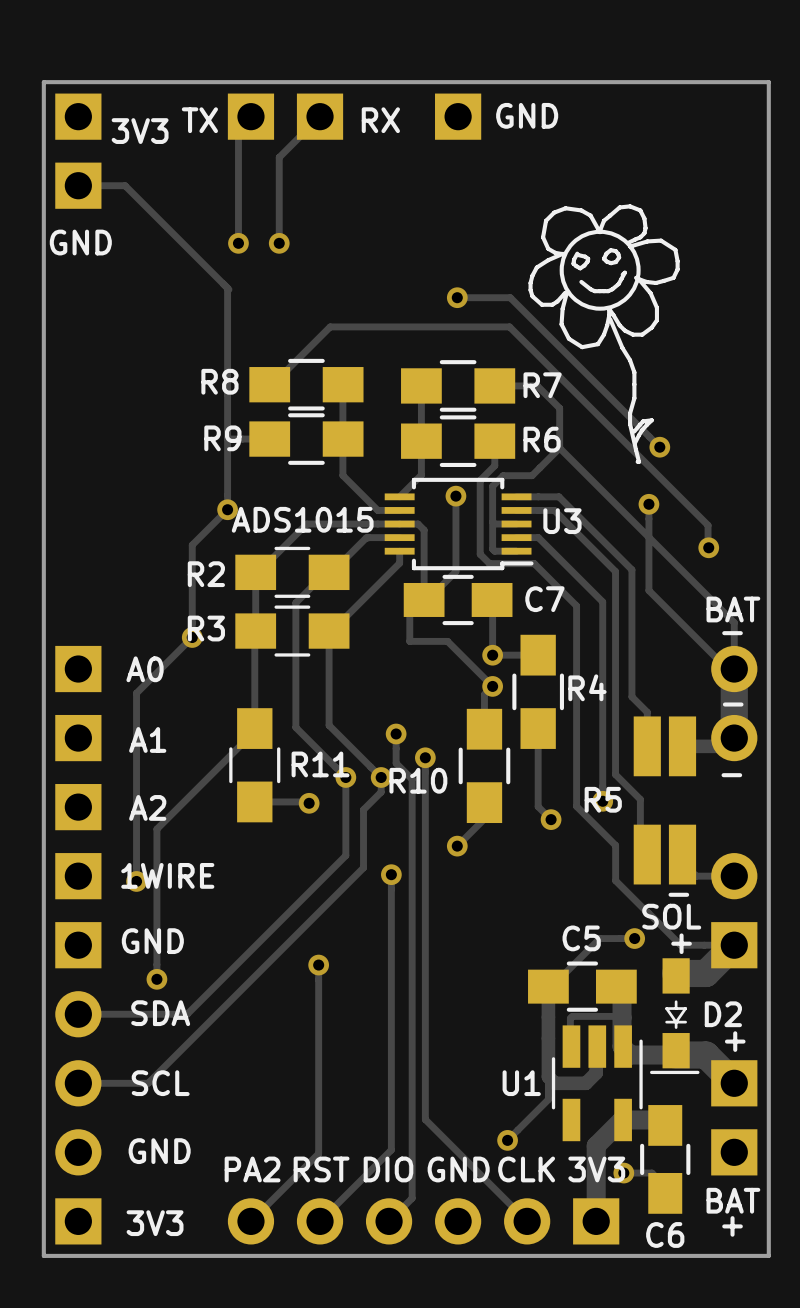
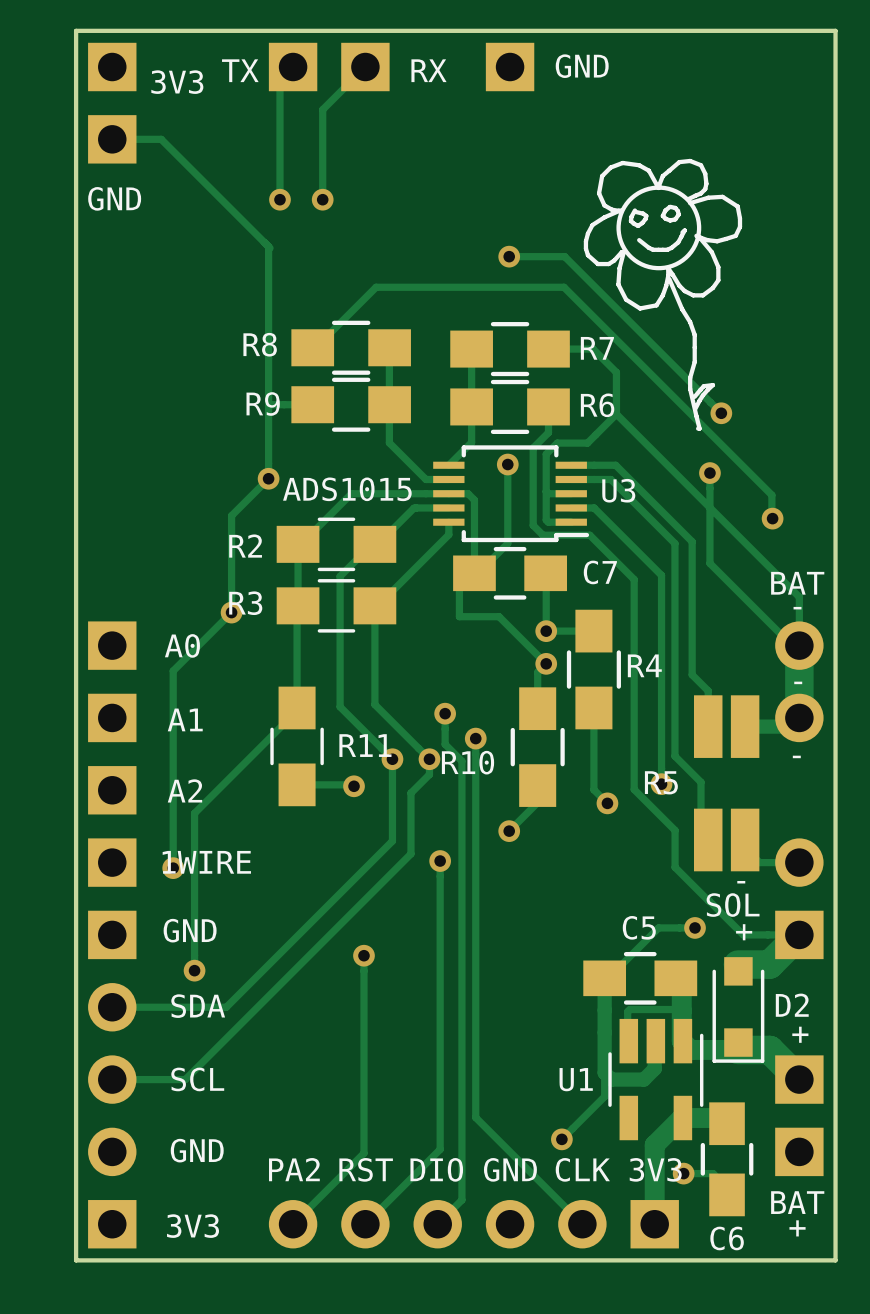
D2 footprint: [650, 958, 700, 1075] -> [712, 957, 765, 1063]

